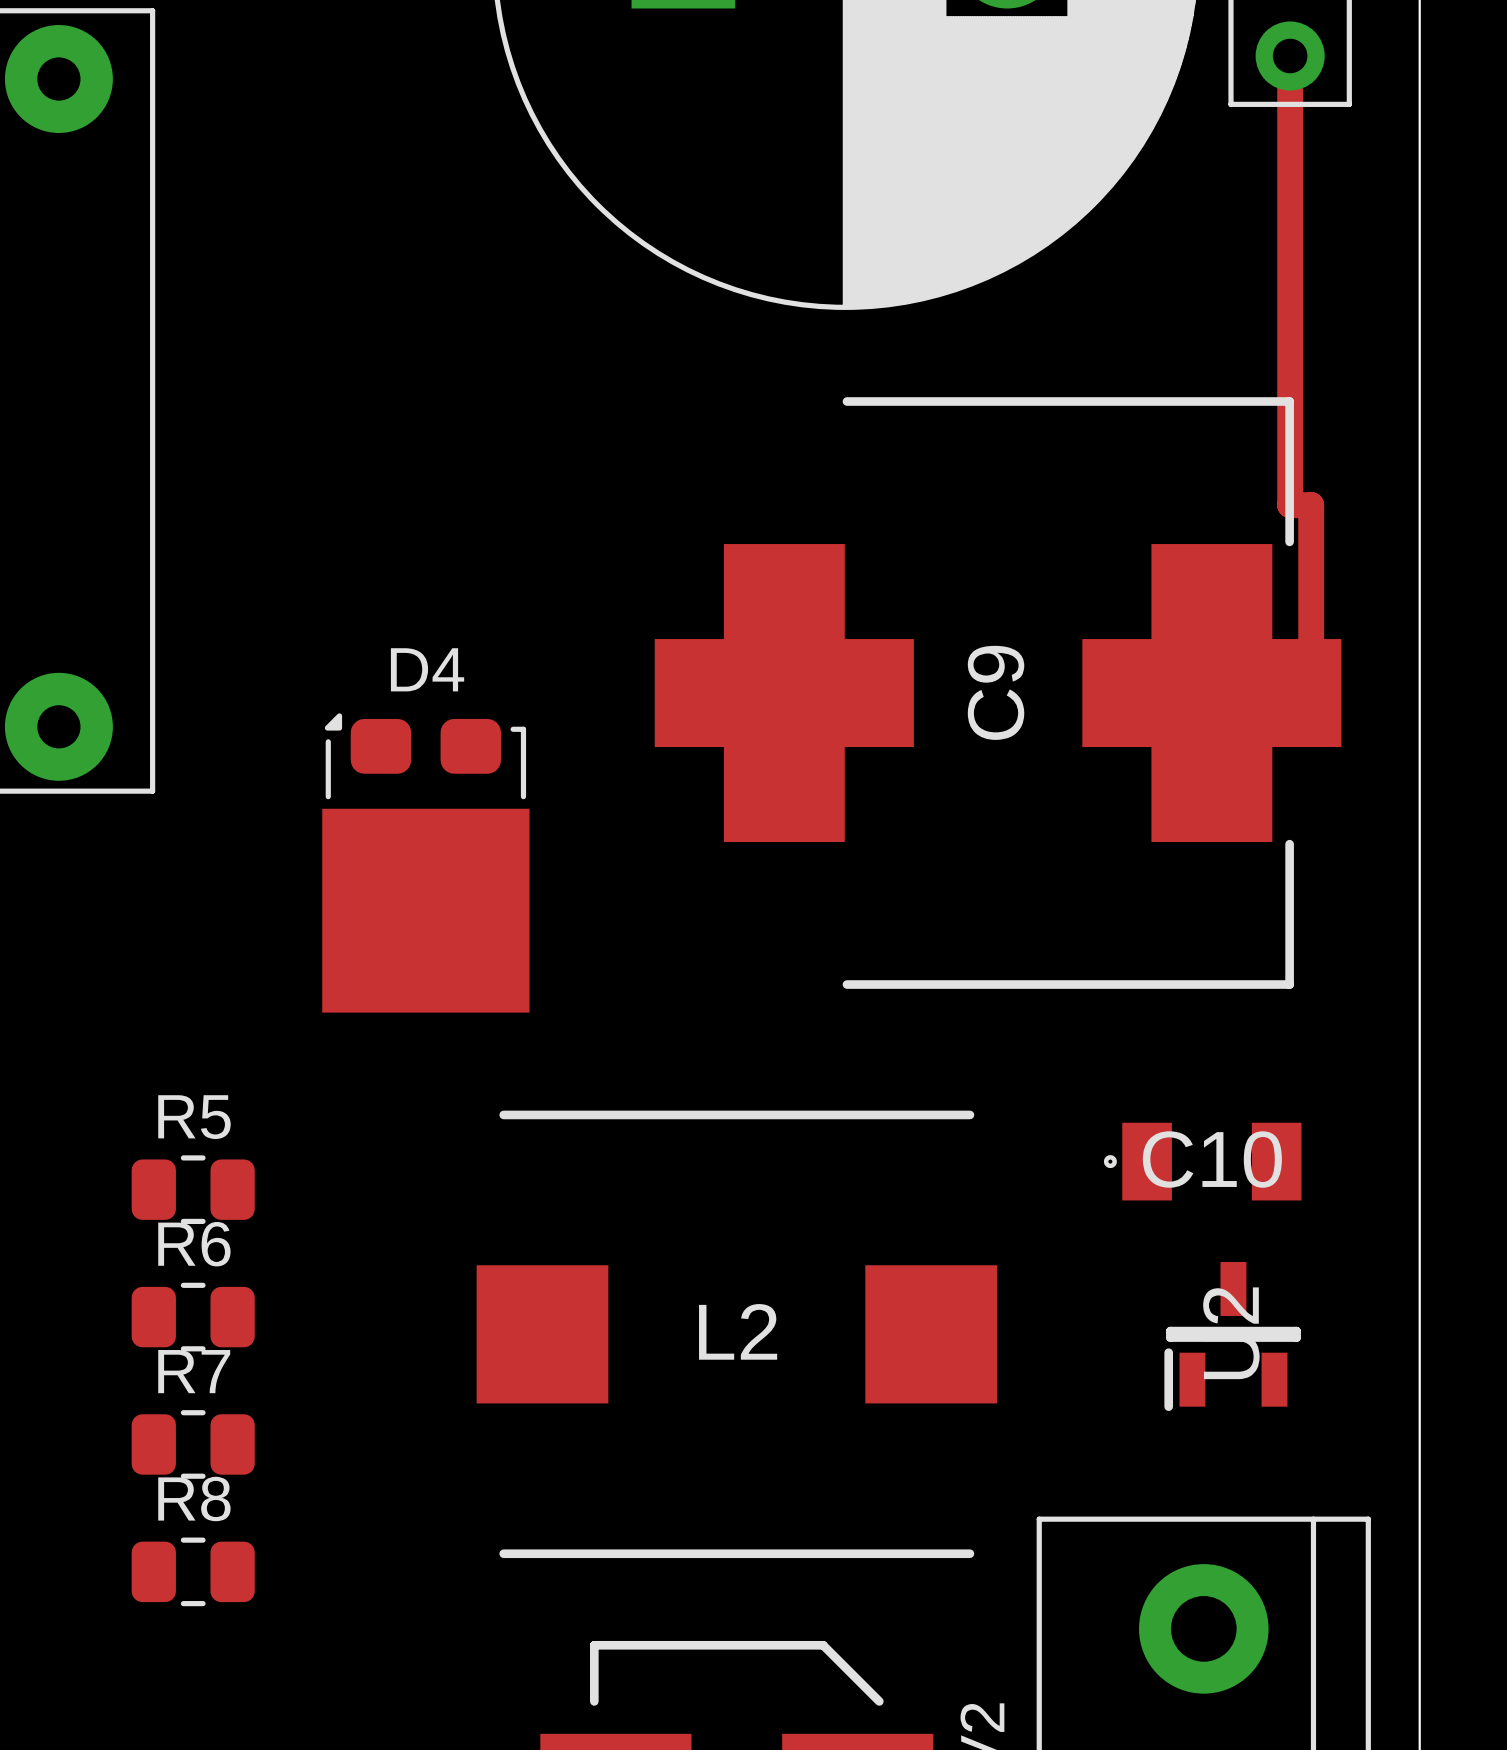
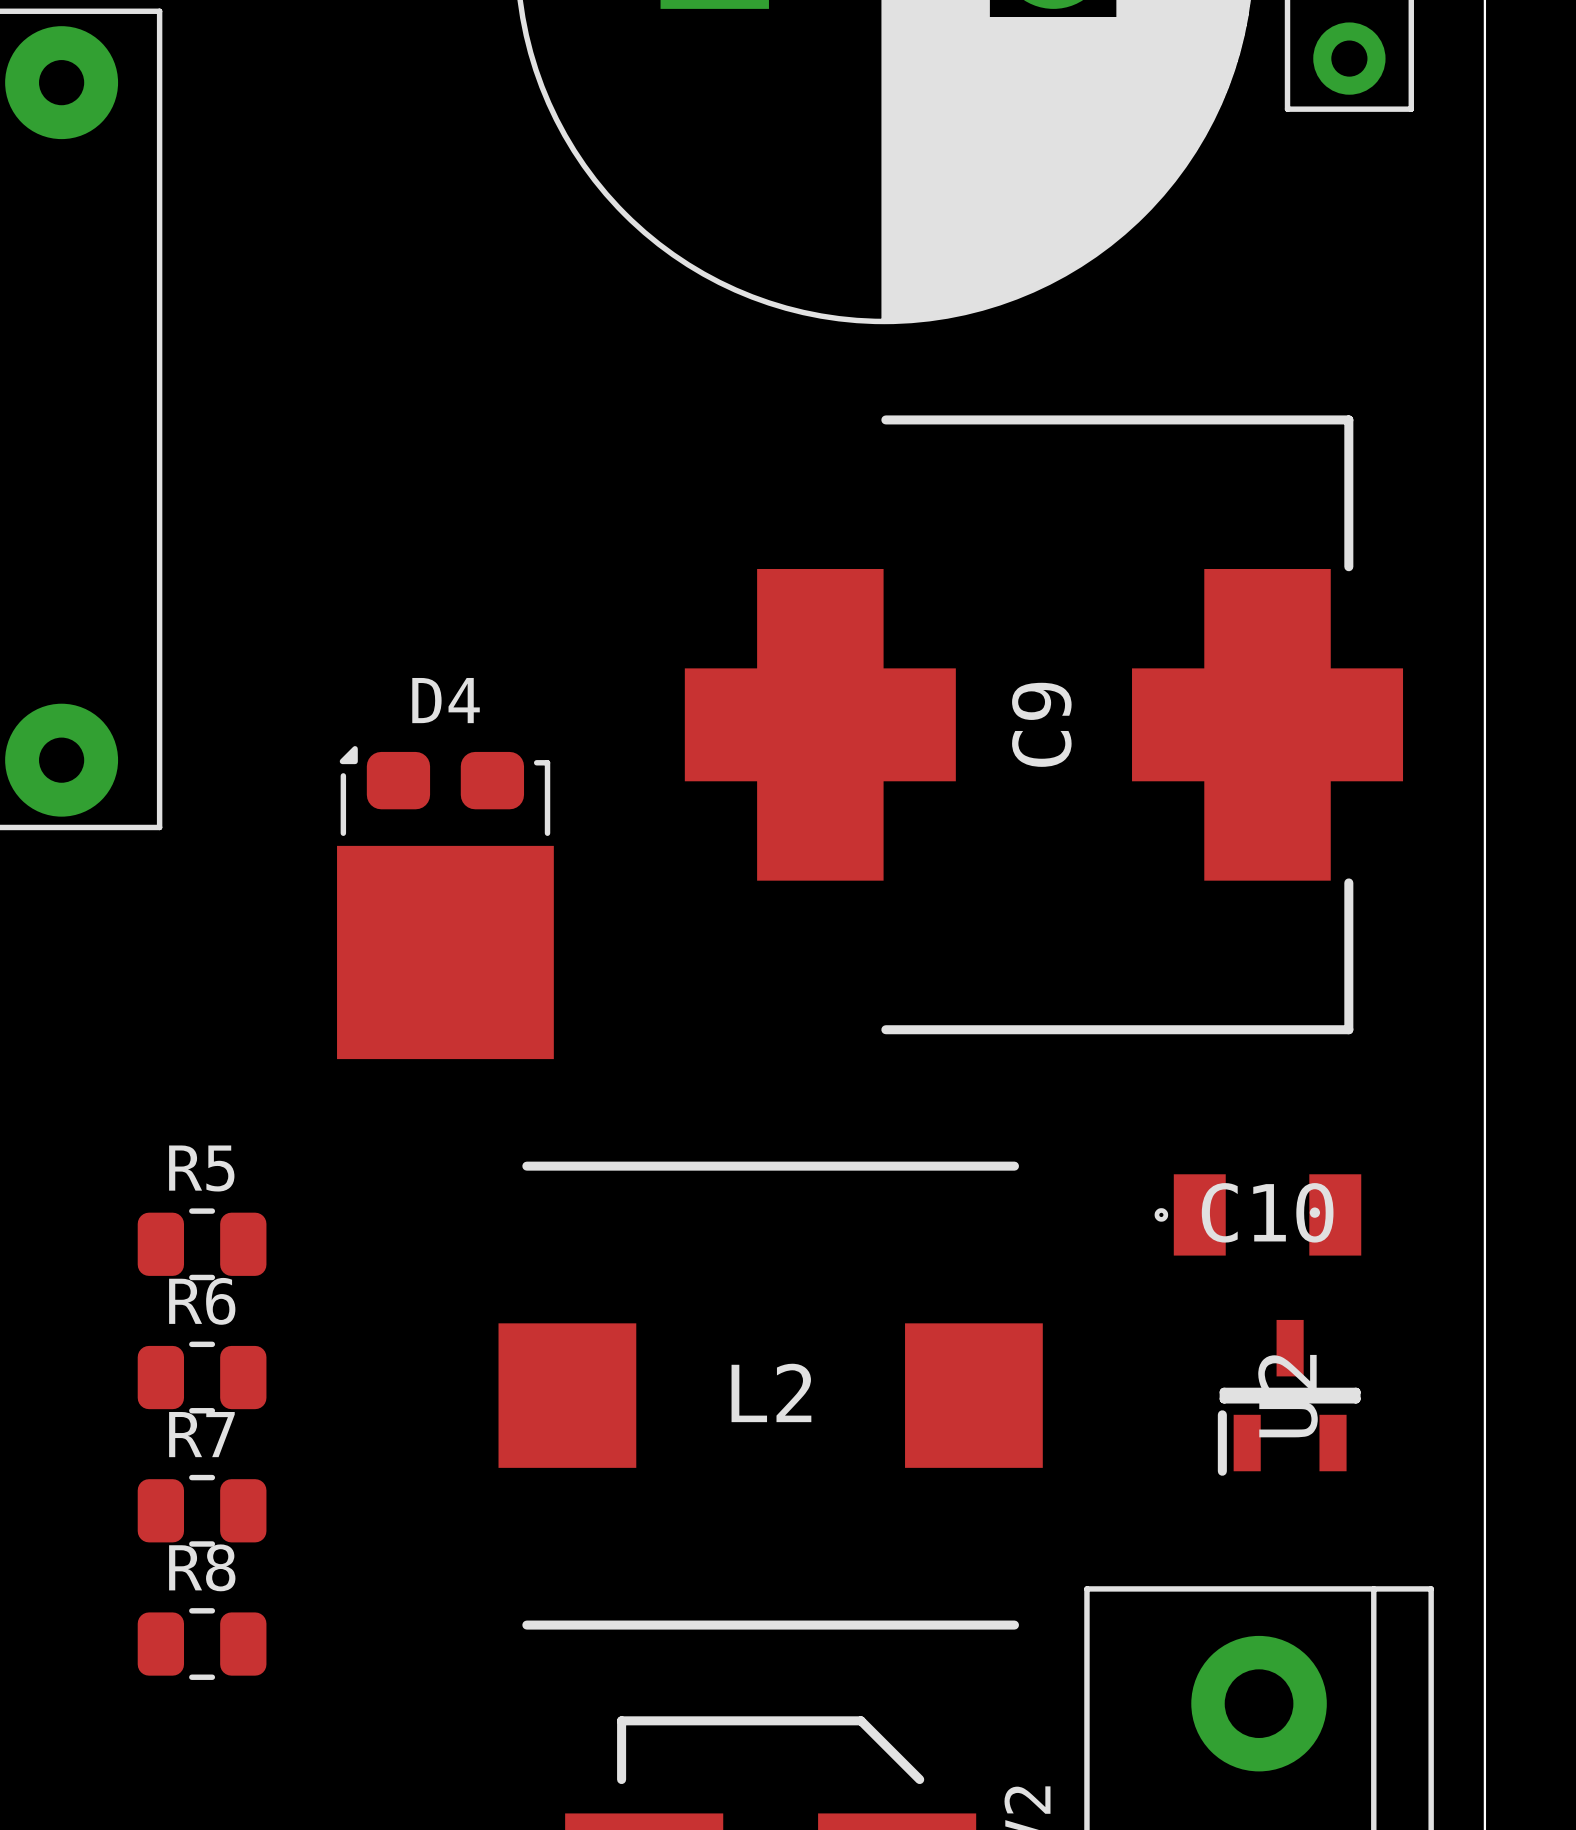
top track: (1290, 56) (1290, 505) (1311, 505) (1311, 677) (1280, 677) (1296, 693) (1211, 693) -> none

